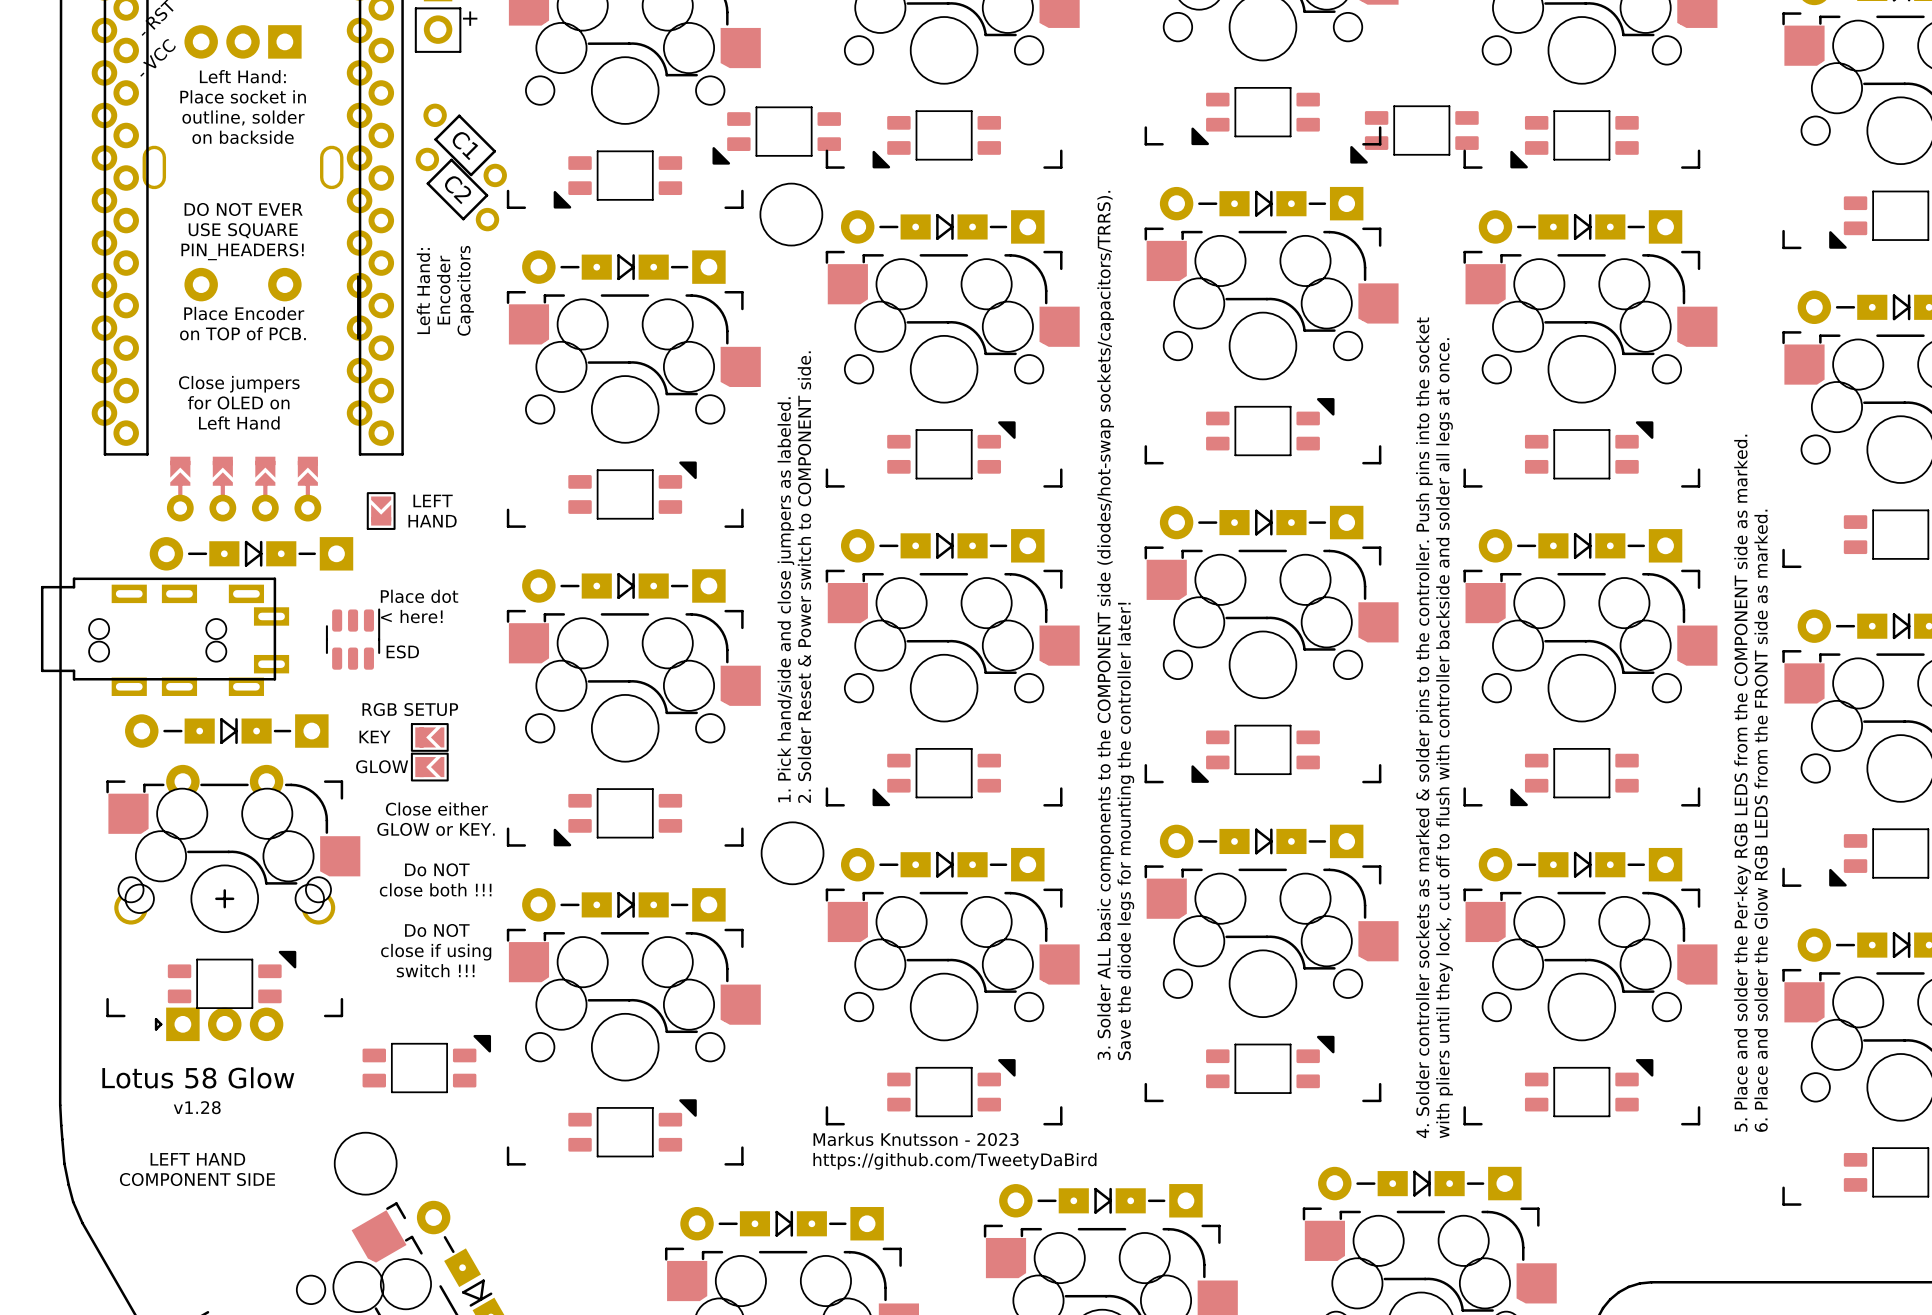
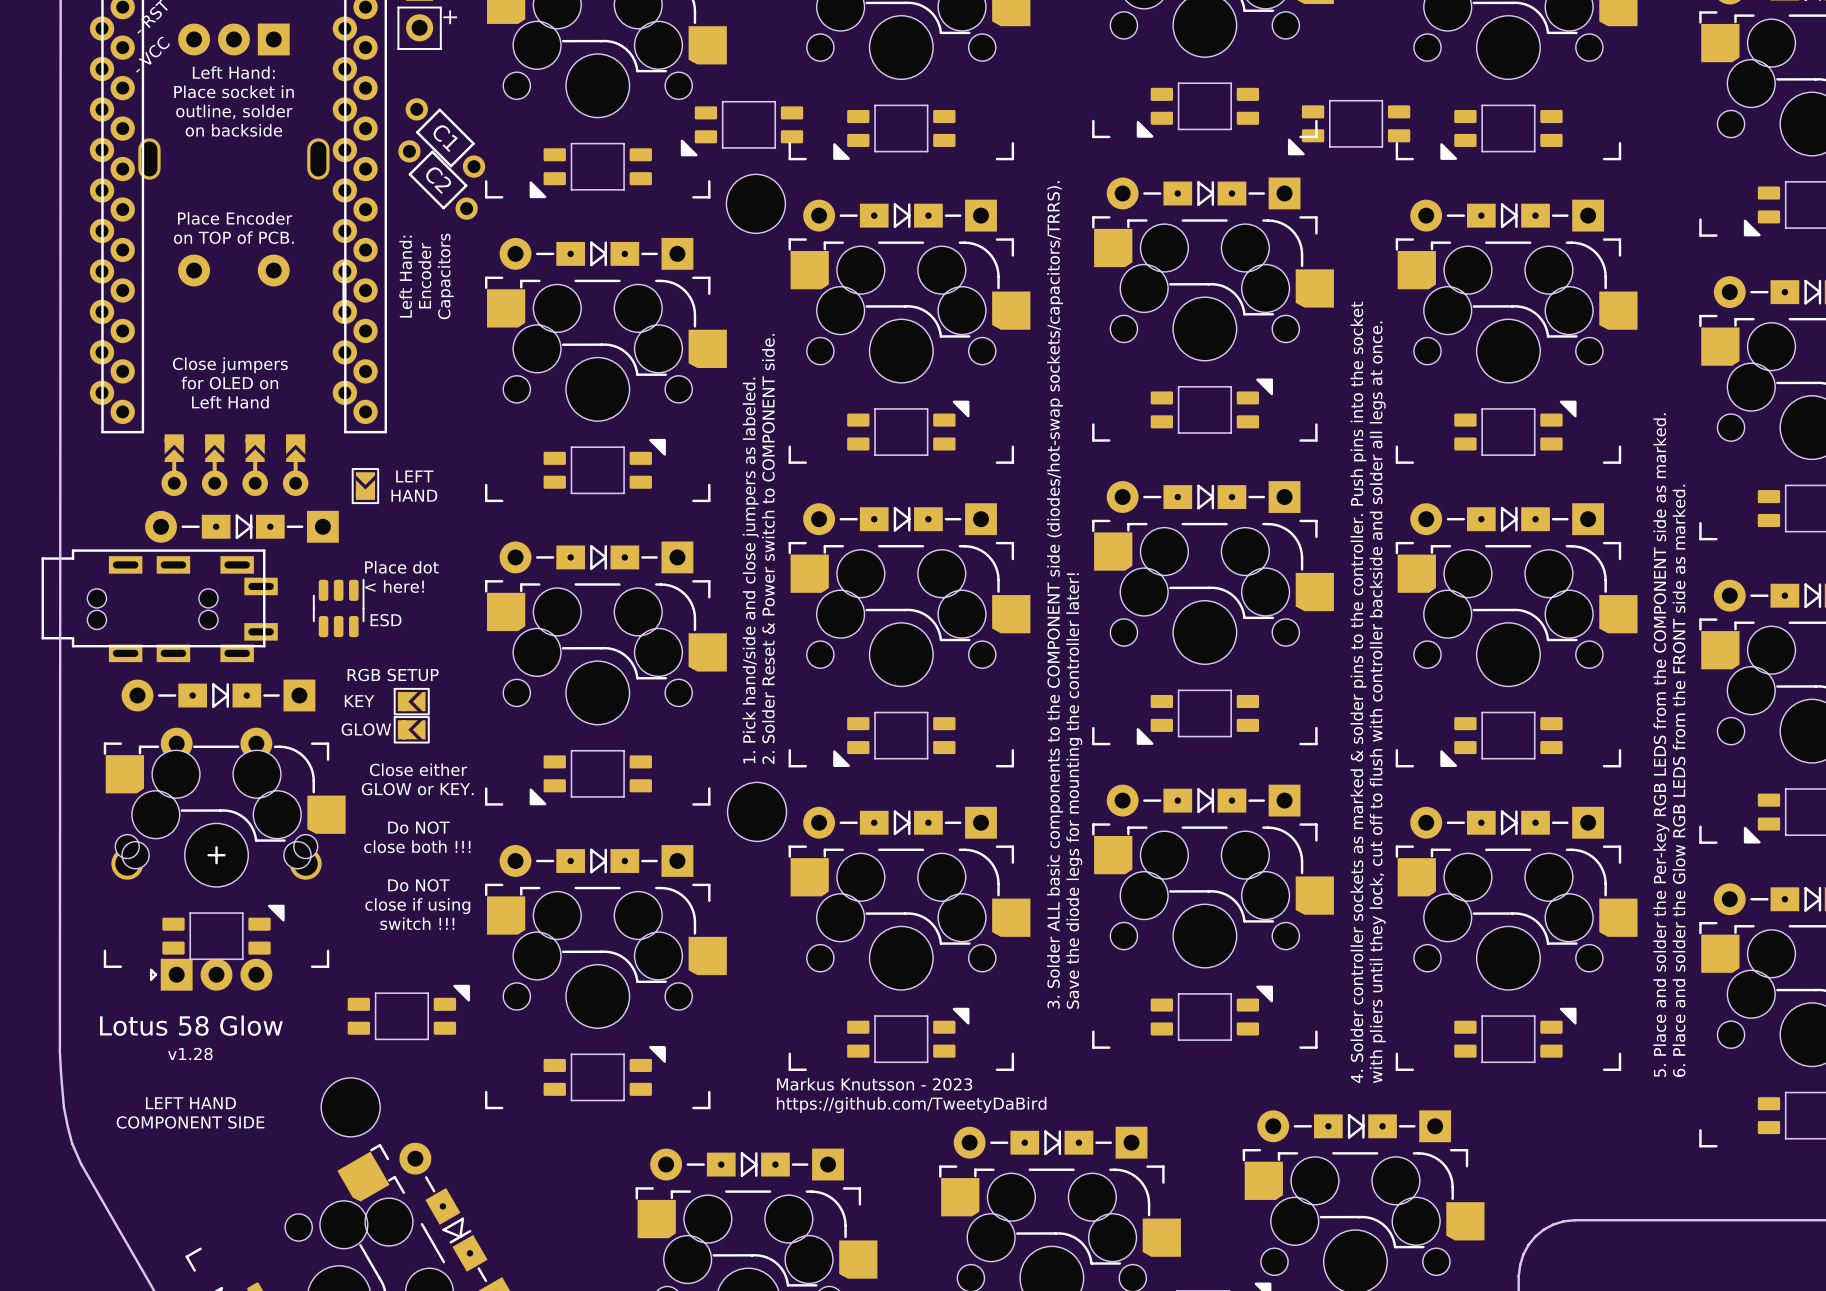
text: DO NOT EVER (243, 209) -> none
text: USE SQUARE (243, 230) -> Place Encoder (235, 218)
text: PIN_HEADERS! (242, 251) -> on TOP of PCB. (233, 237)
text: Place Encoder (244, 313) -> none
text: on TOP of PCB. (242, 333) -> none

